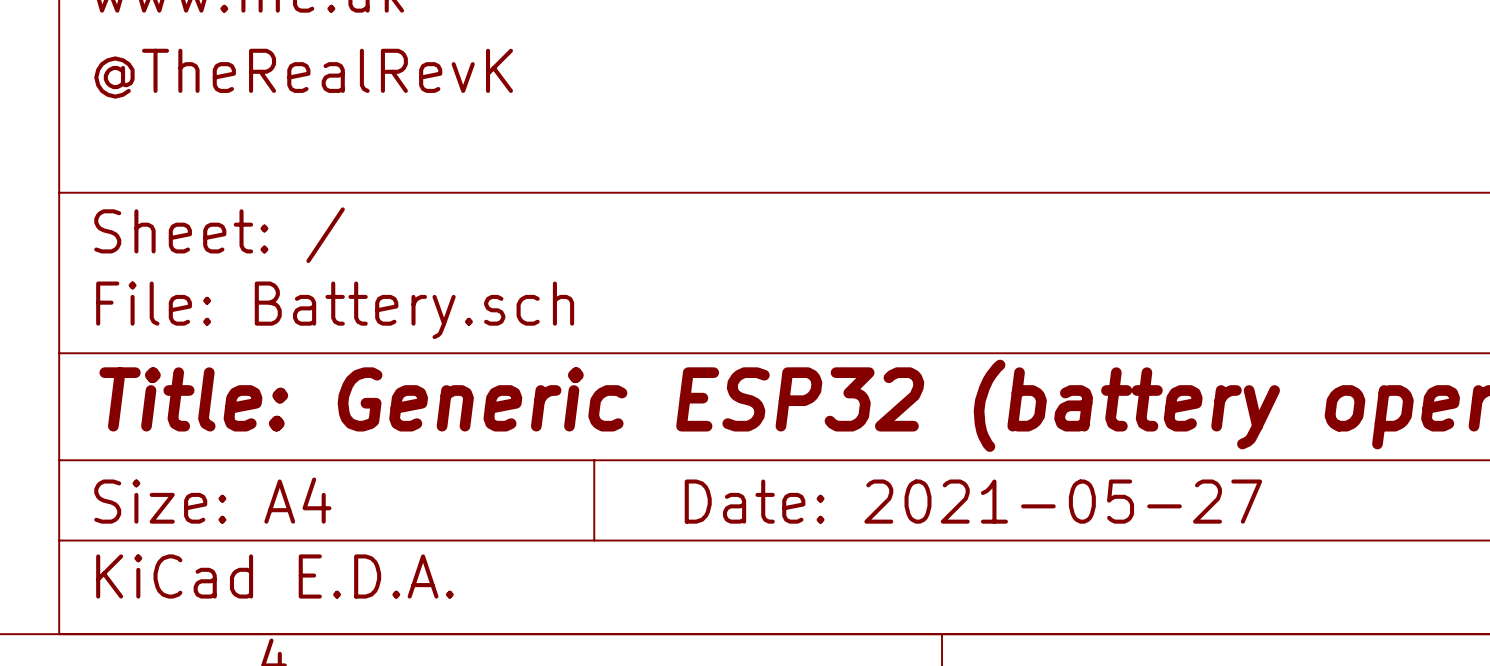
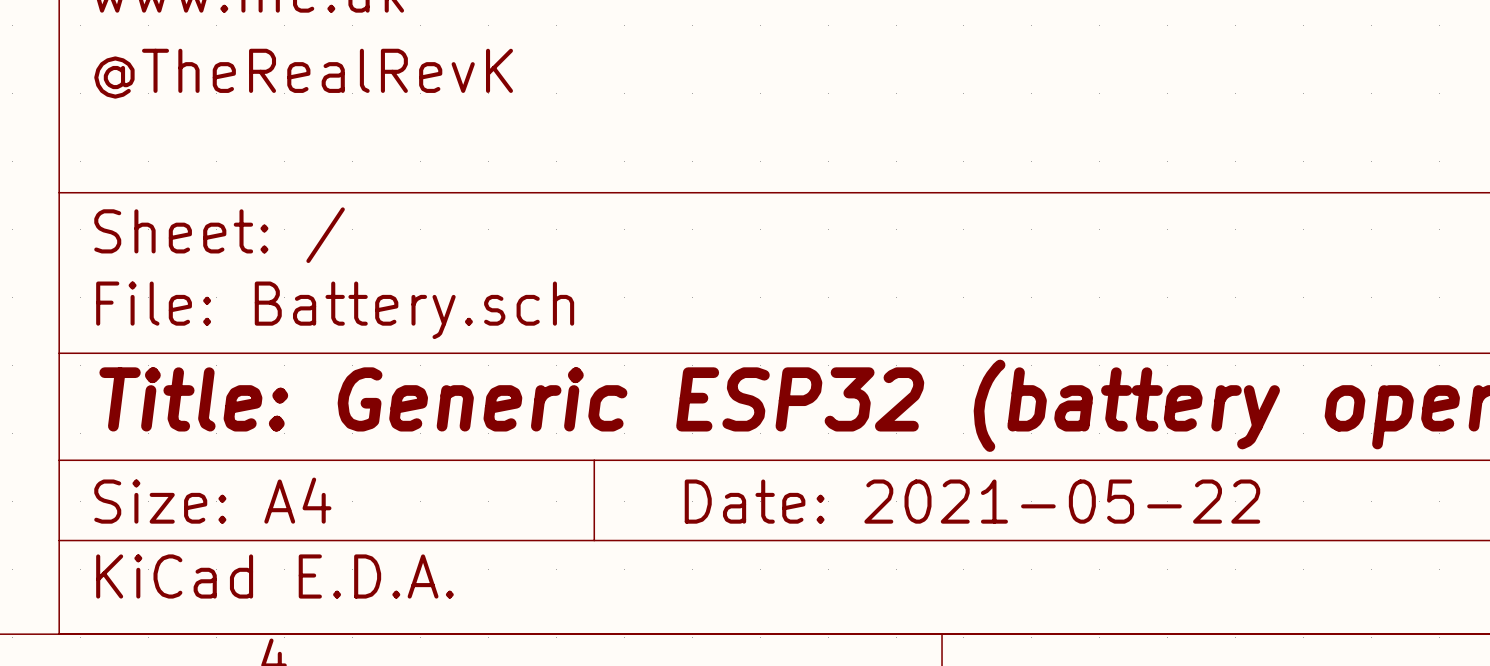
title block: Date: 2021-05-27 (973, 501) -> Date: 2021-05-22 (972, 501)

